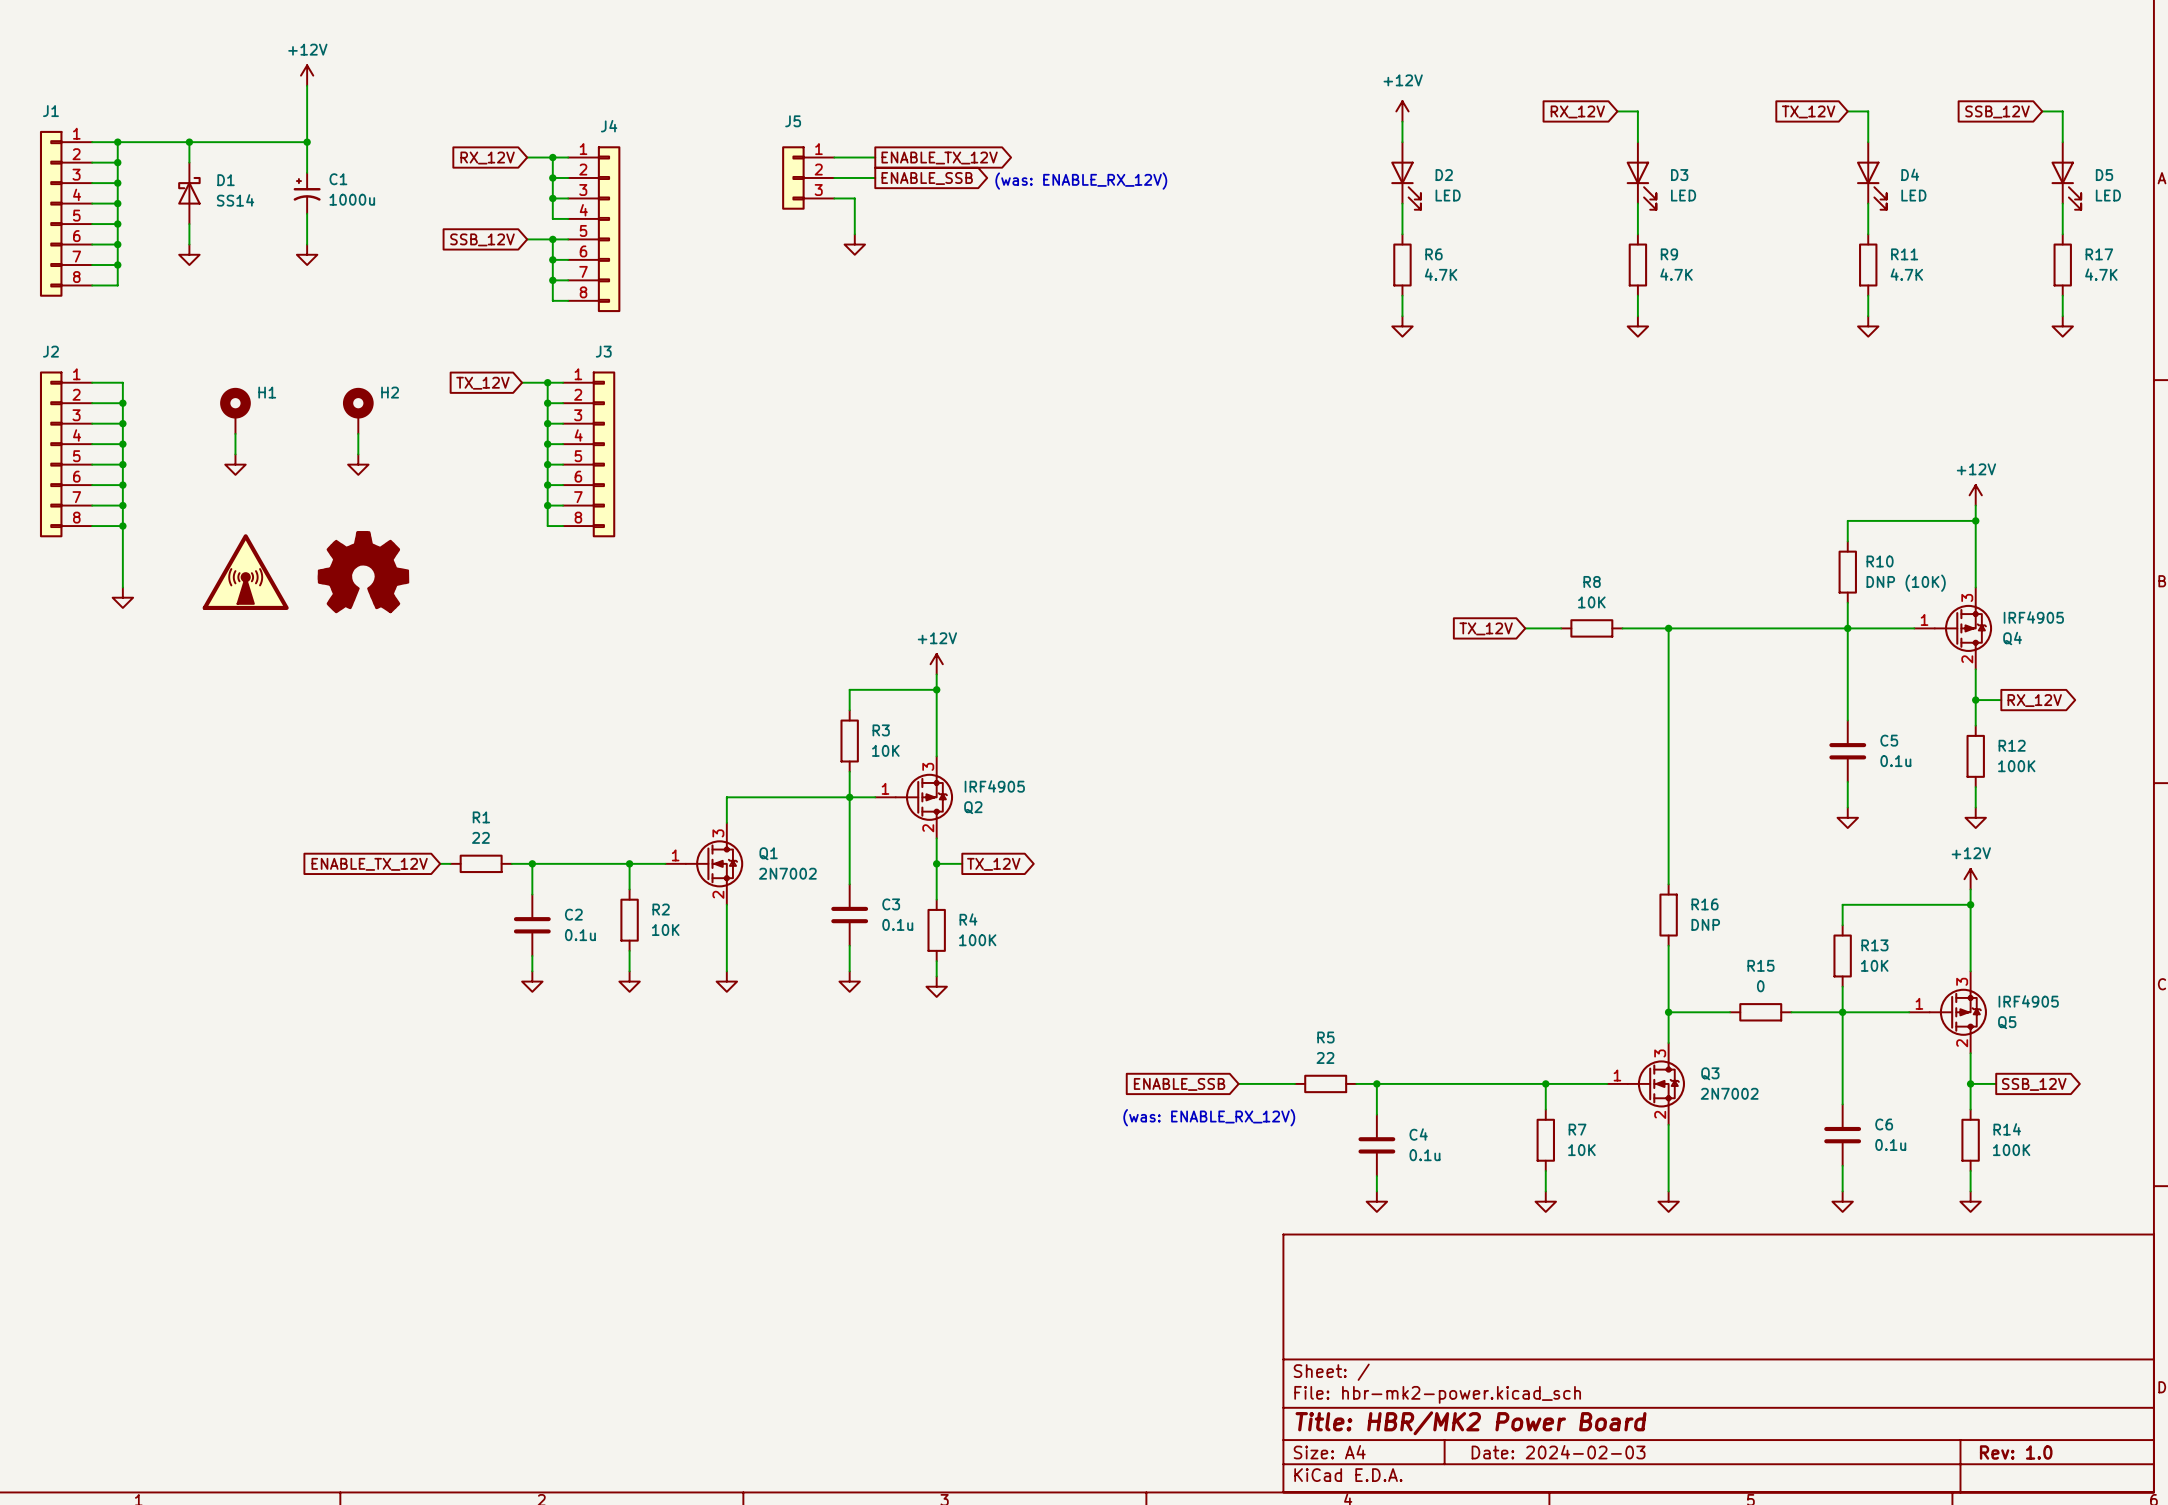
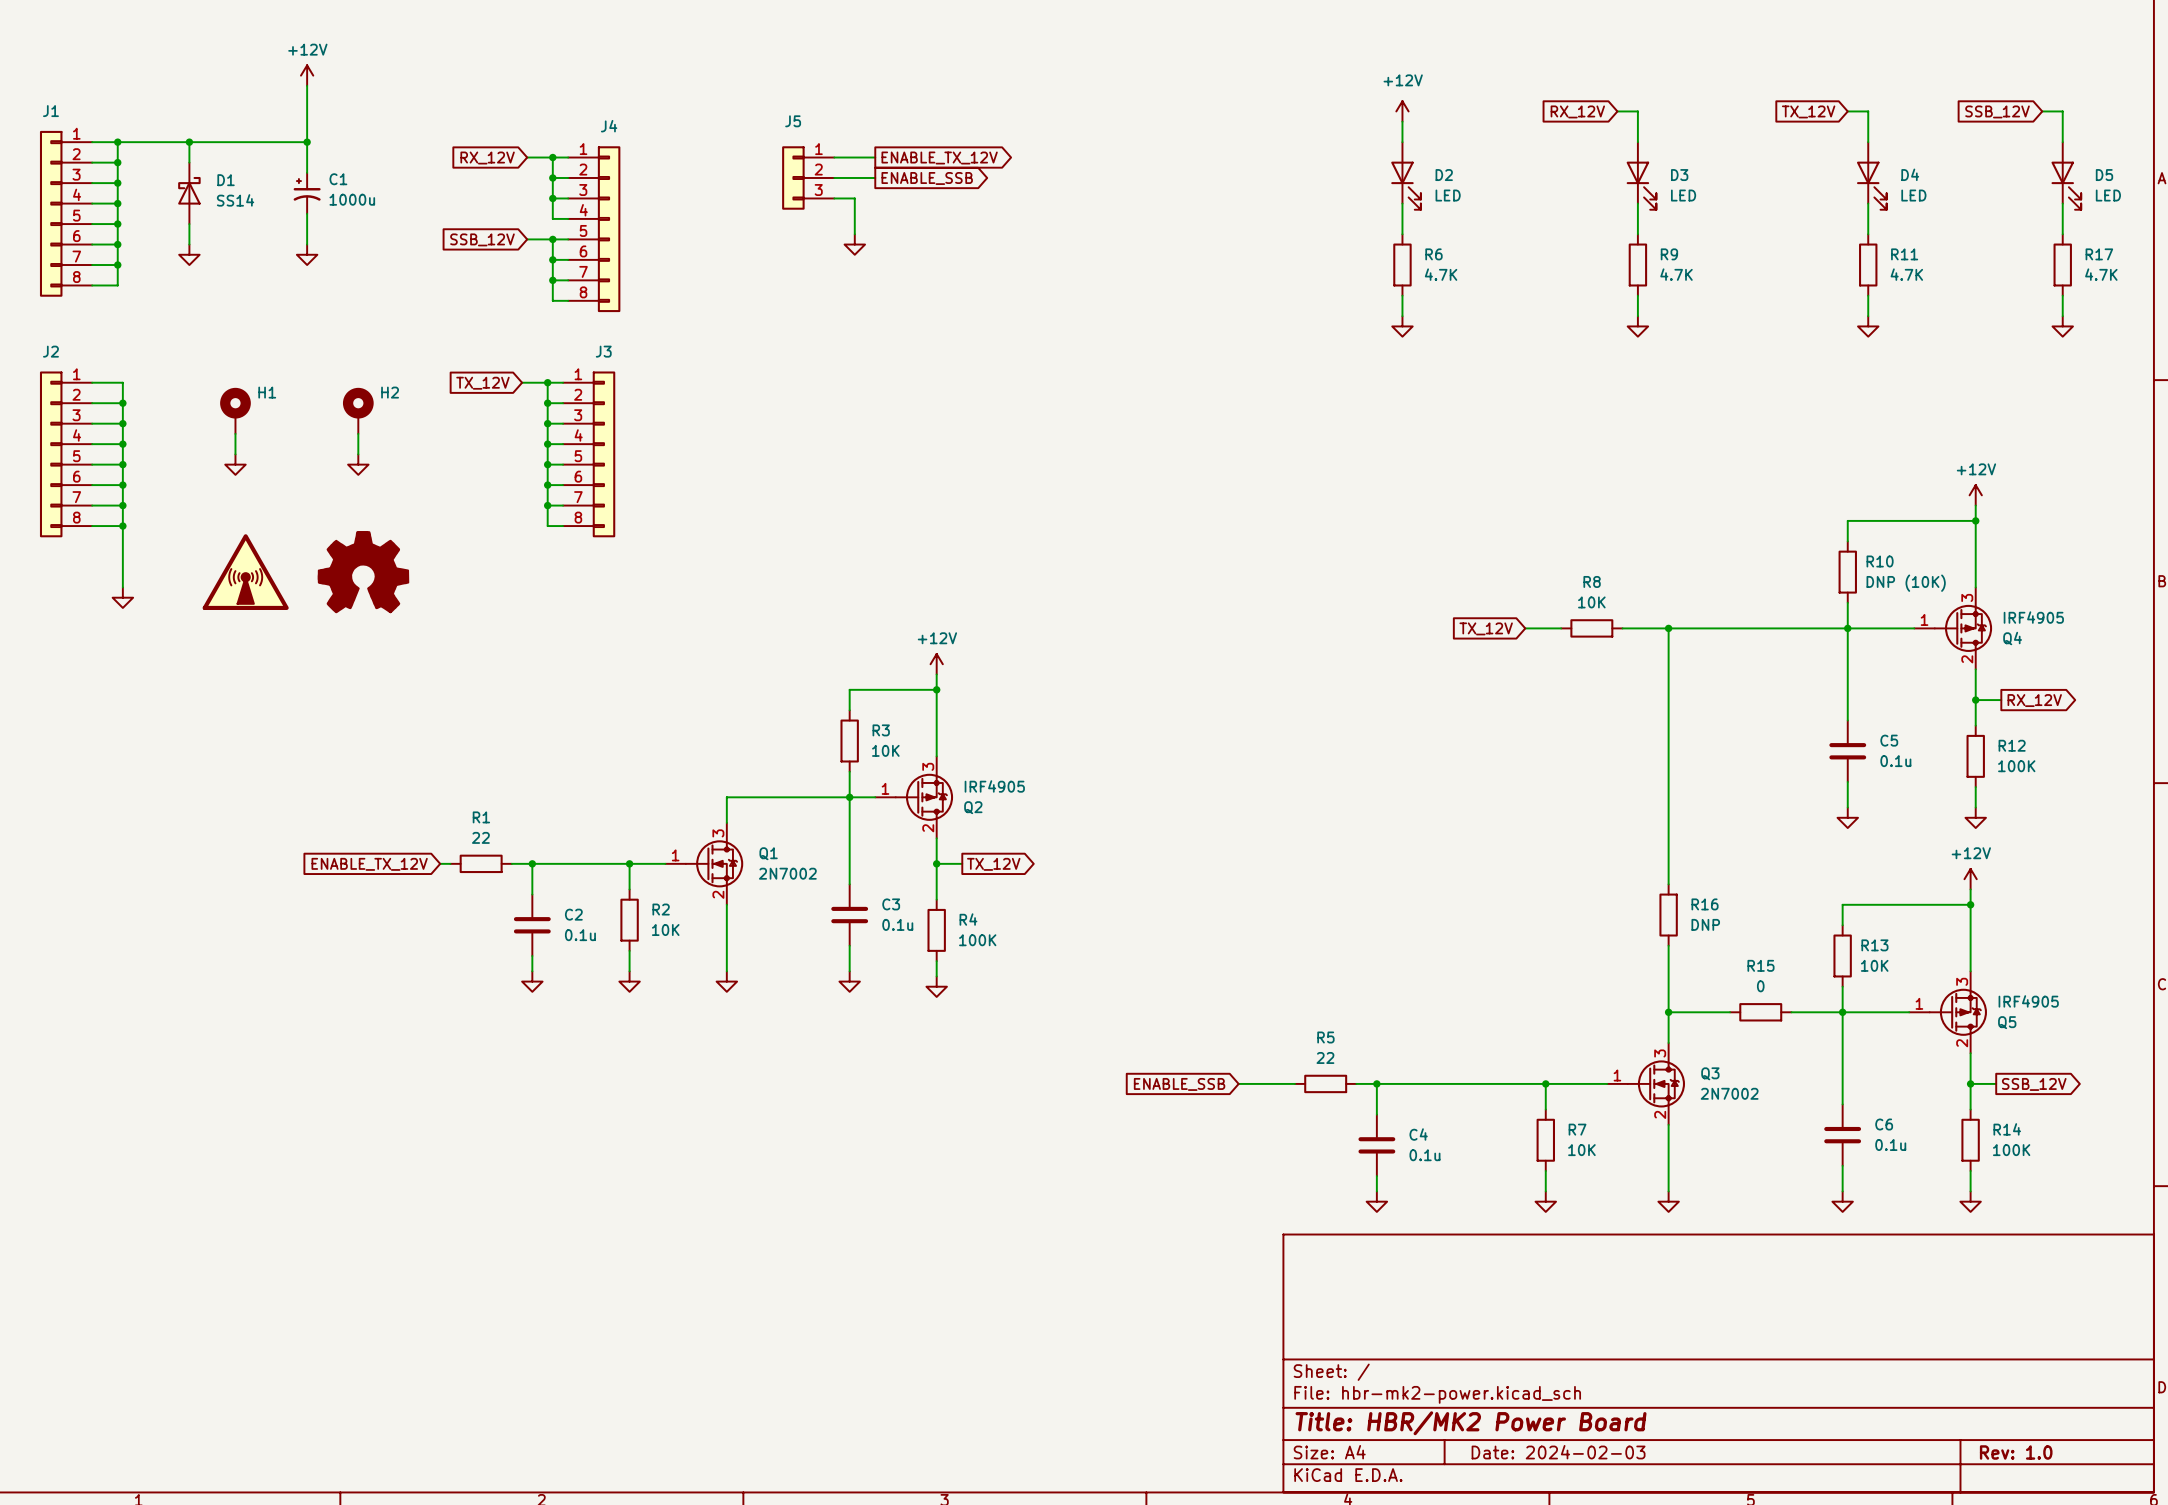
text: (was: ENABLE_RX_12V) (1081, 181) -> none
text: (was: ENABLE_RX_12V) (1209, 1117) -> none

